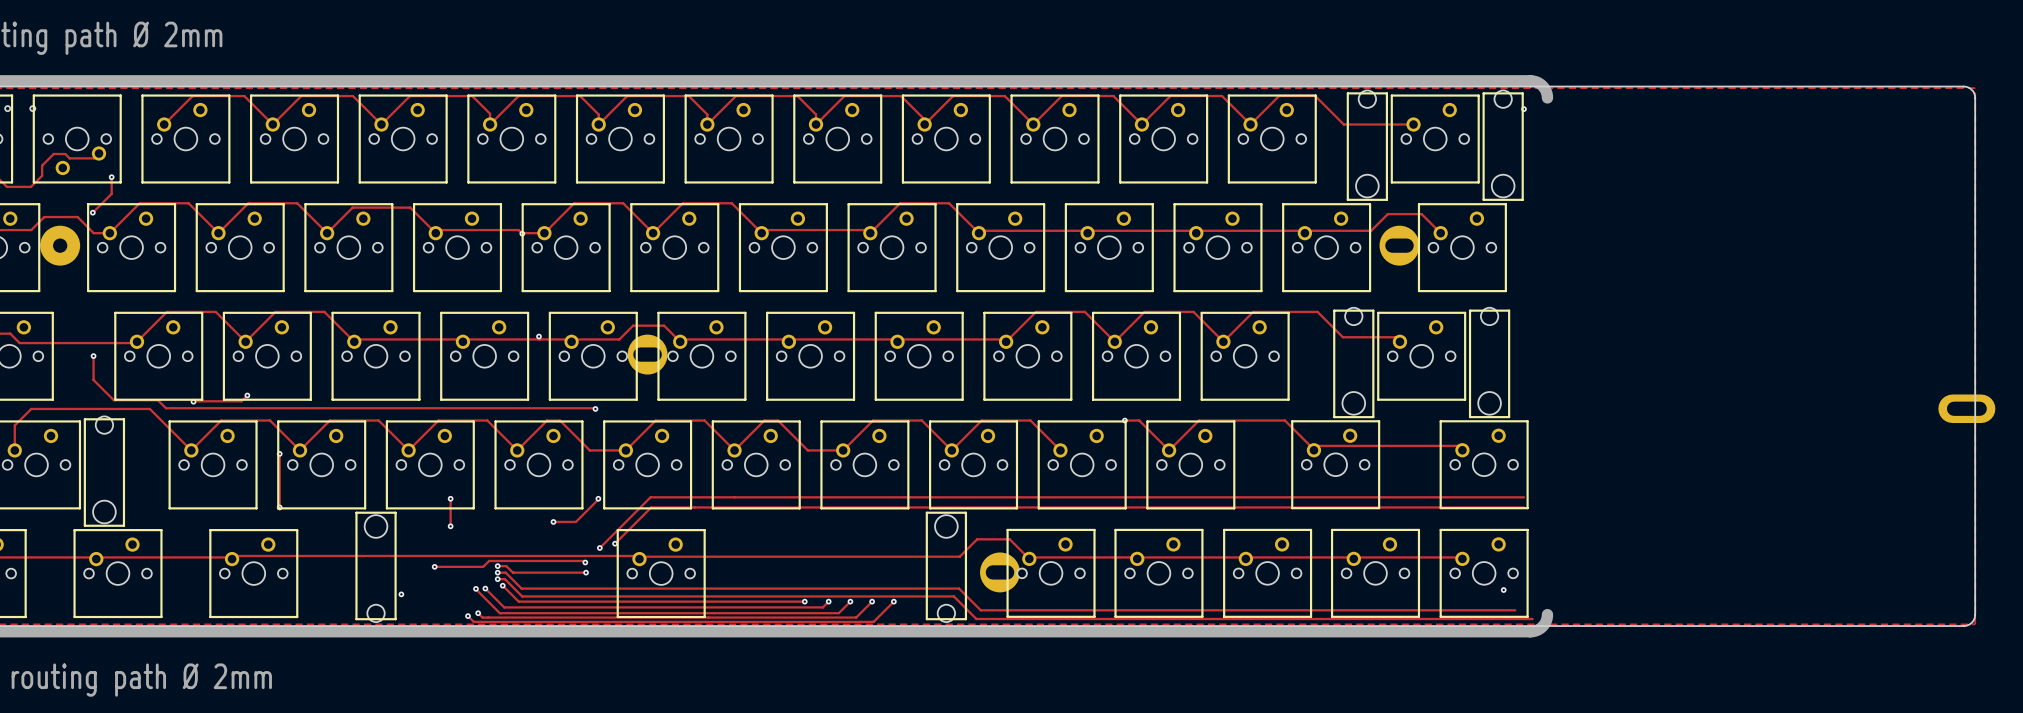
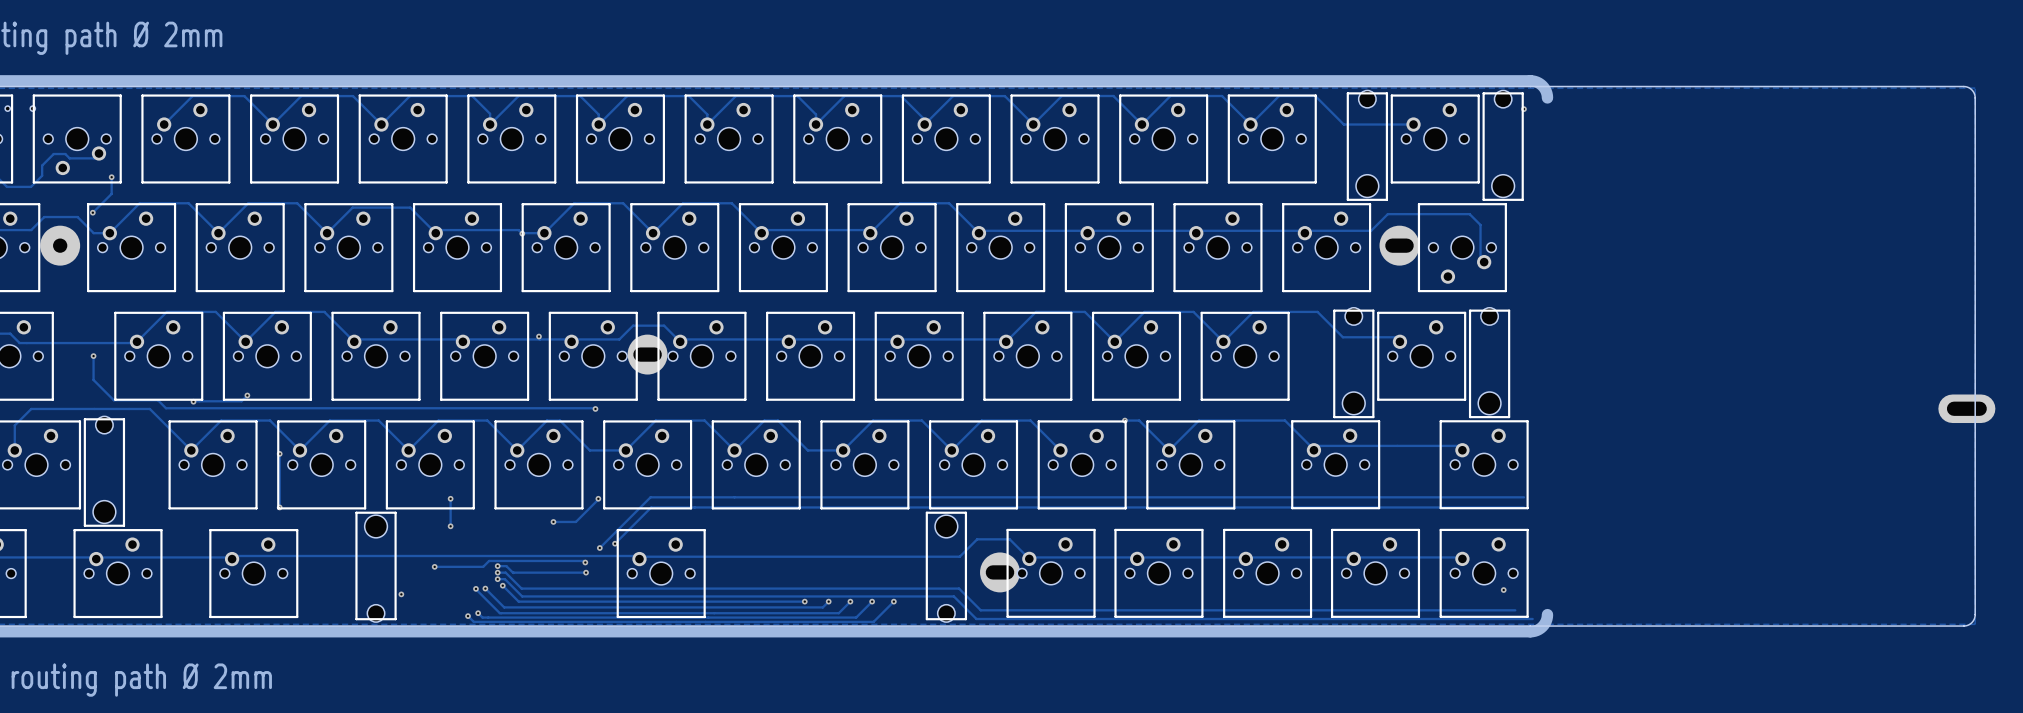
track: (1421, 214) (1440, 233) -> (1421, 214) (1469, 214) (1480, 225) (1480, 258) (1484, 262)
part rotation: 0° (1462, 247) -> 180° (1462, 247)

